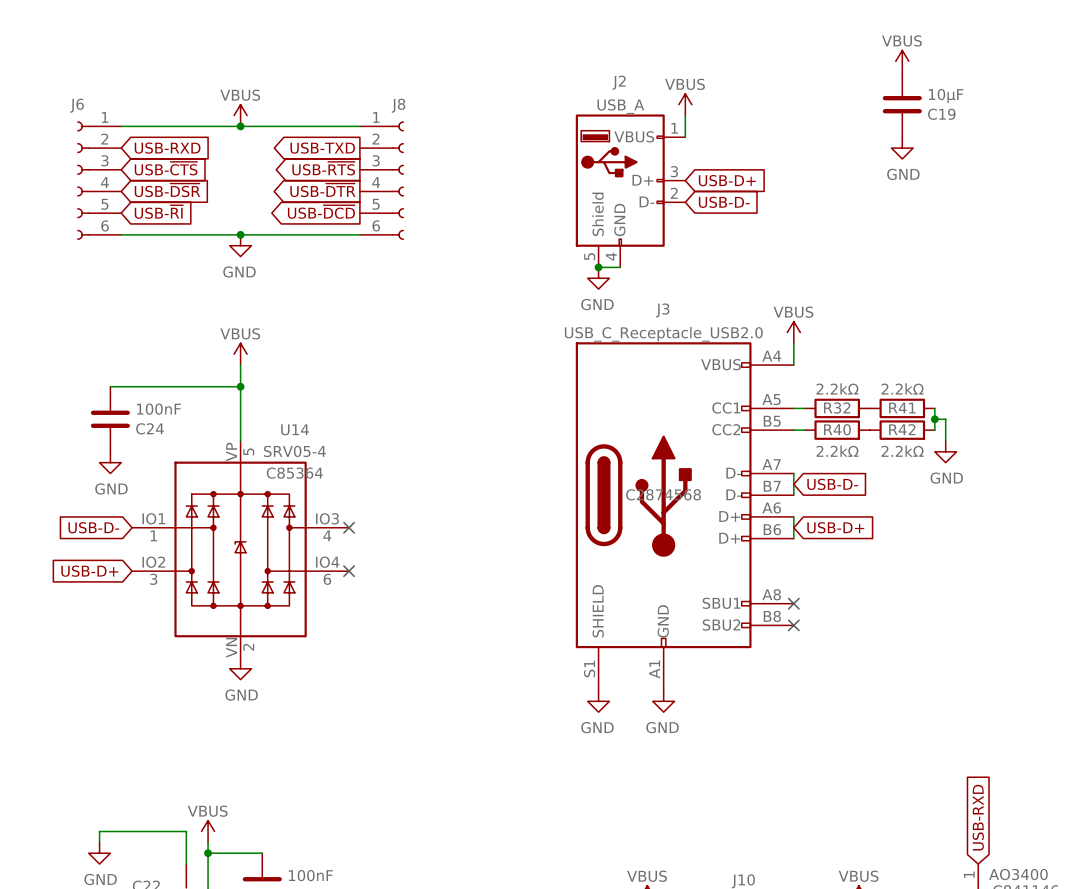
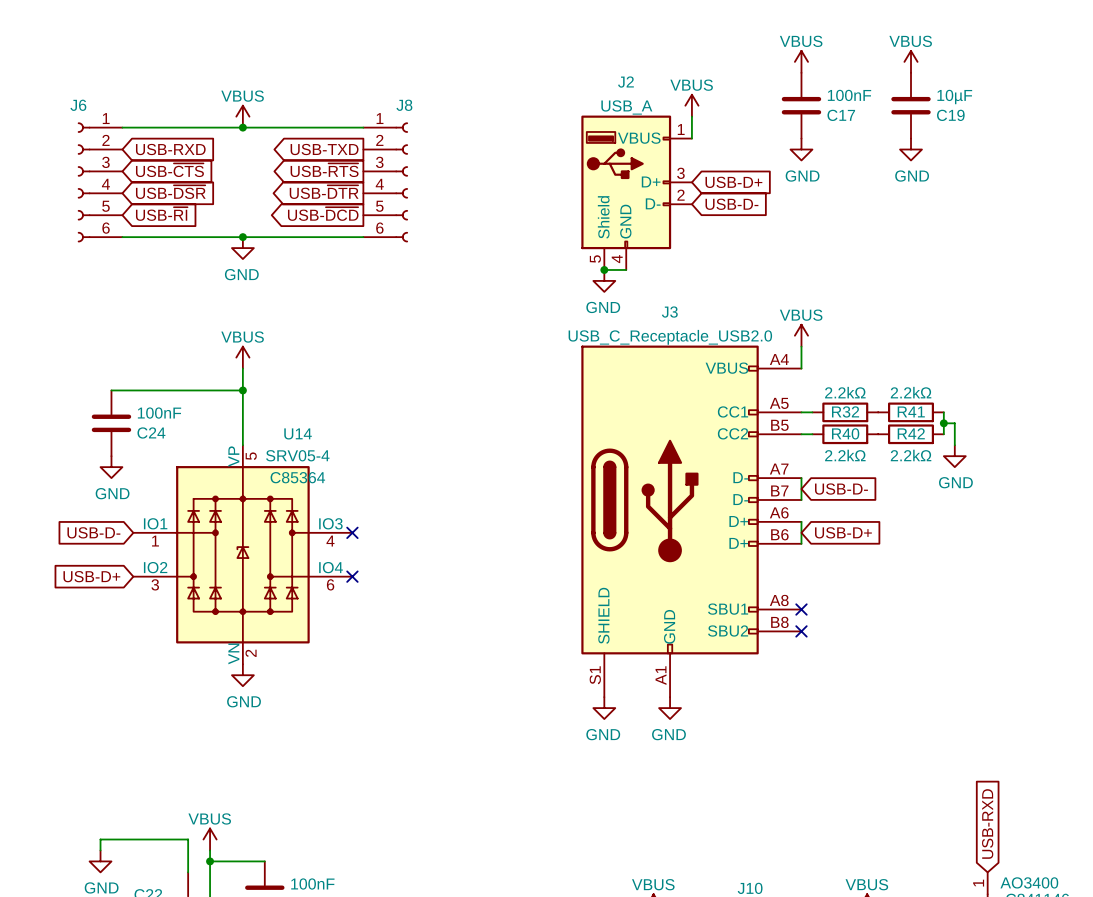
power symbol: none -> VBUS (801, 61)
C17: none -> 100nF (801, 105)
power symbol: none -> GND (801, 149)
J3 text: C2874568 (663, 494) -> none

